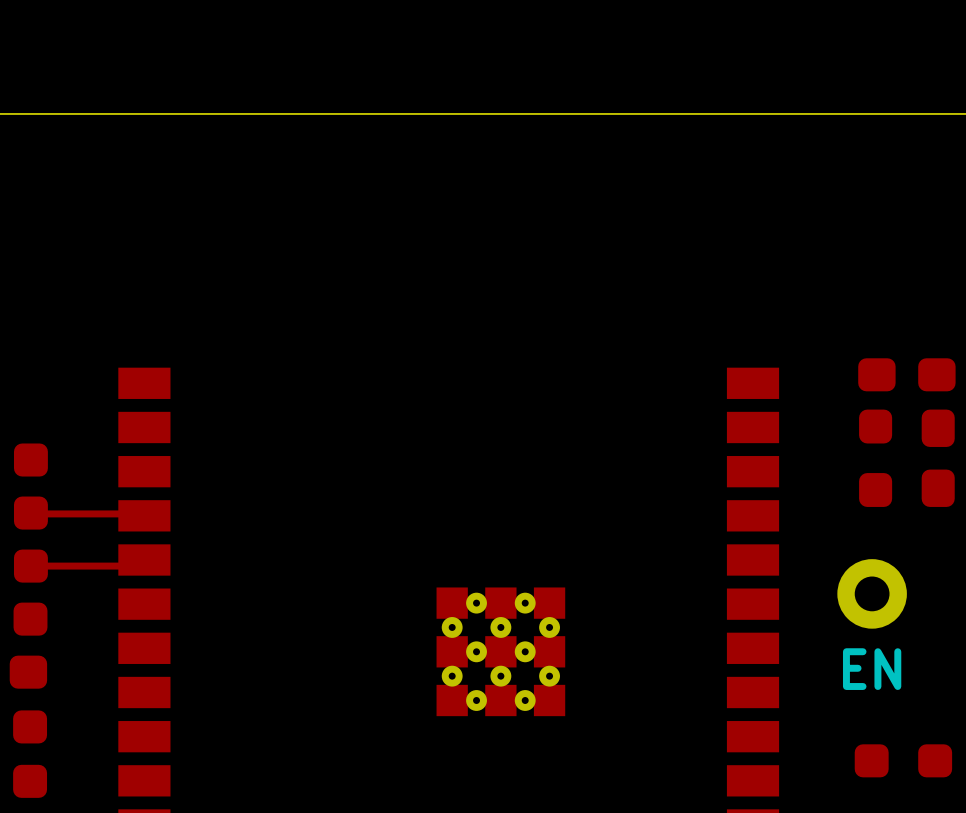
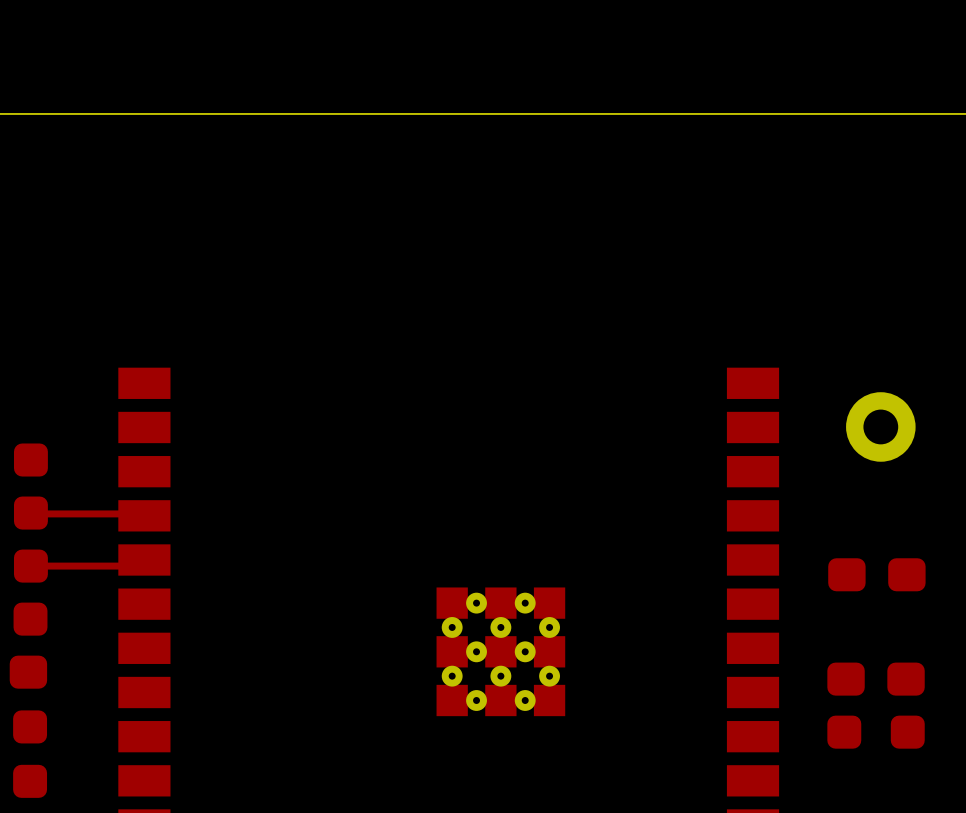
part: (906, 374) -> none
part: none -> (880, 426)
part: (875, 458) -> none
part: (938, 458) -> none
part footprint: [837, 559, 907, 629] -> [828, 558, 926, 592]
text: EN (872, 669) -> none
part: none -> (876, 679)
part position: (903, 760) -> (876, 732)

